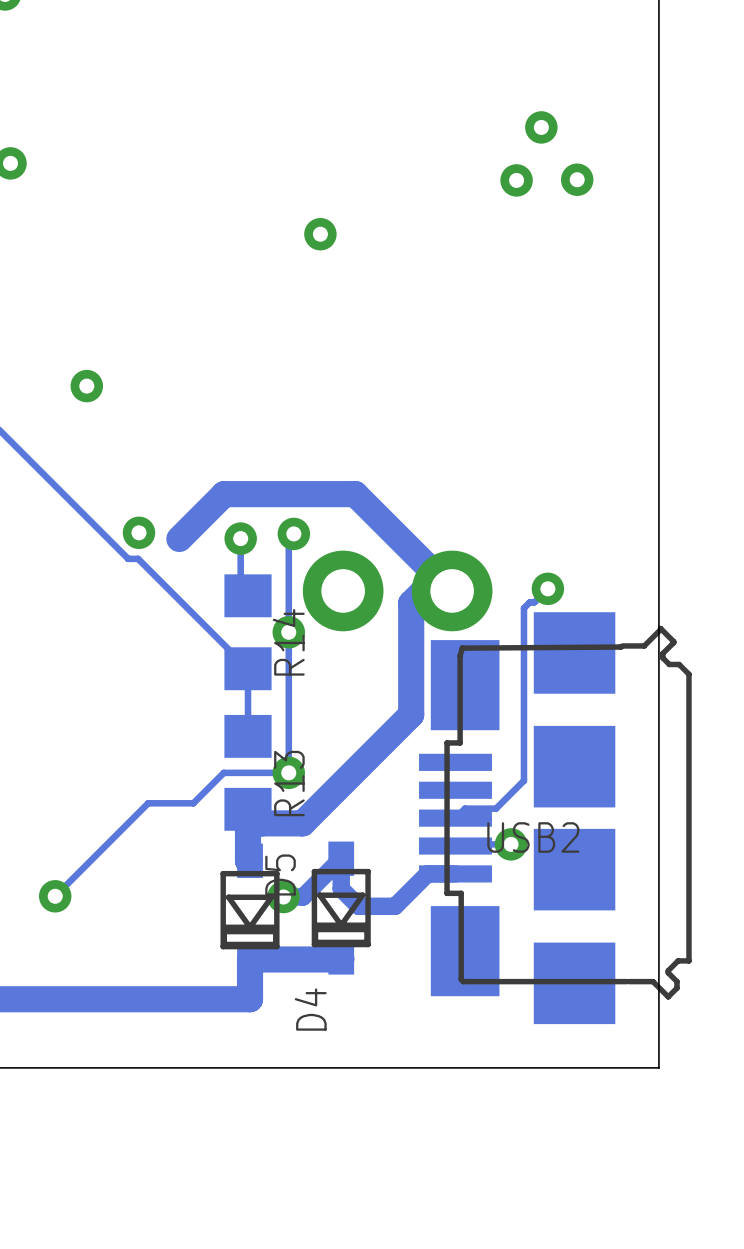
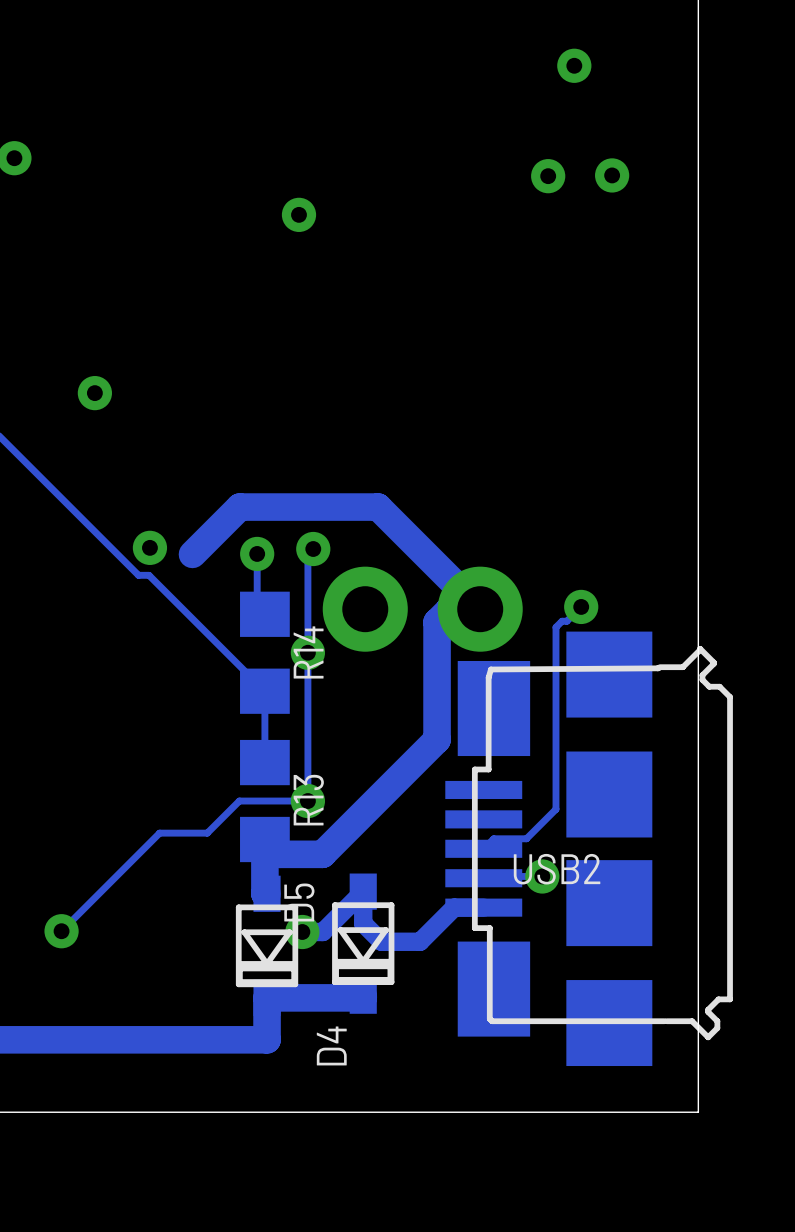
via position: (541, 127) -> (574, 65)
via position: (320, 234) -> (298, 214)

